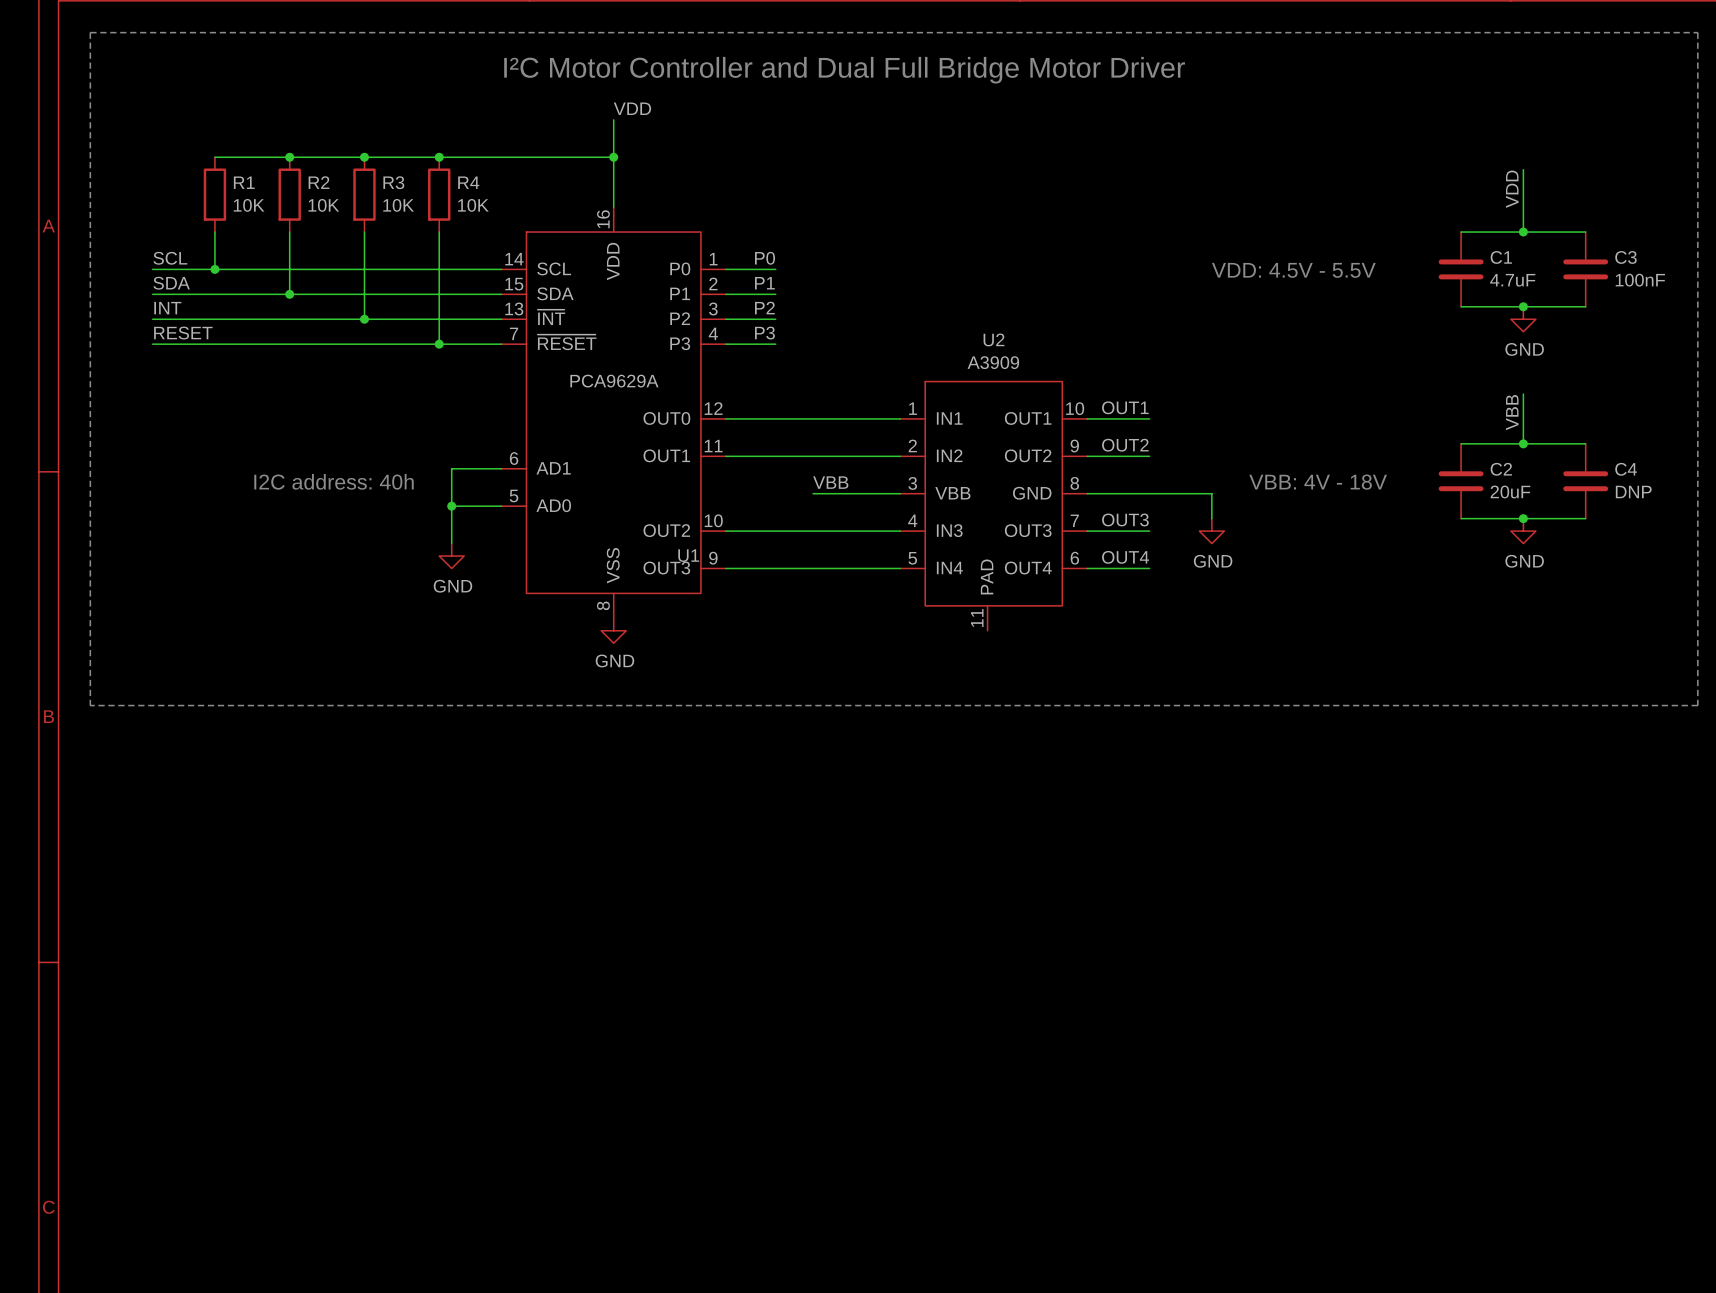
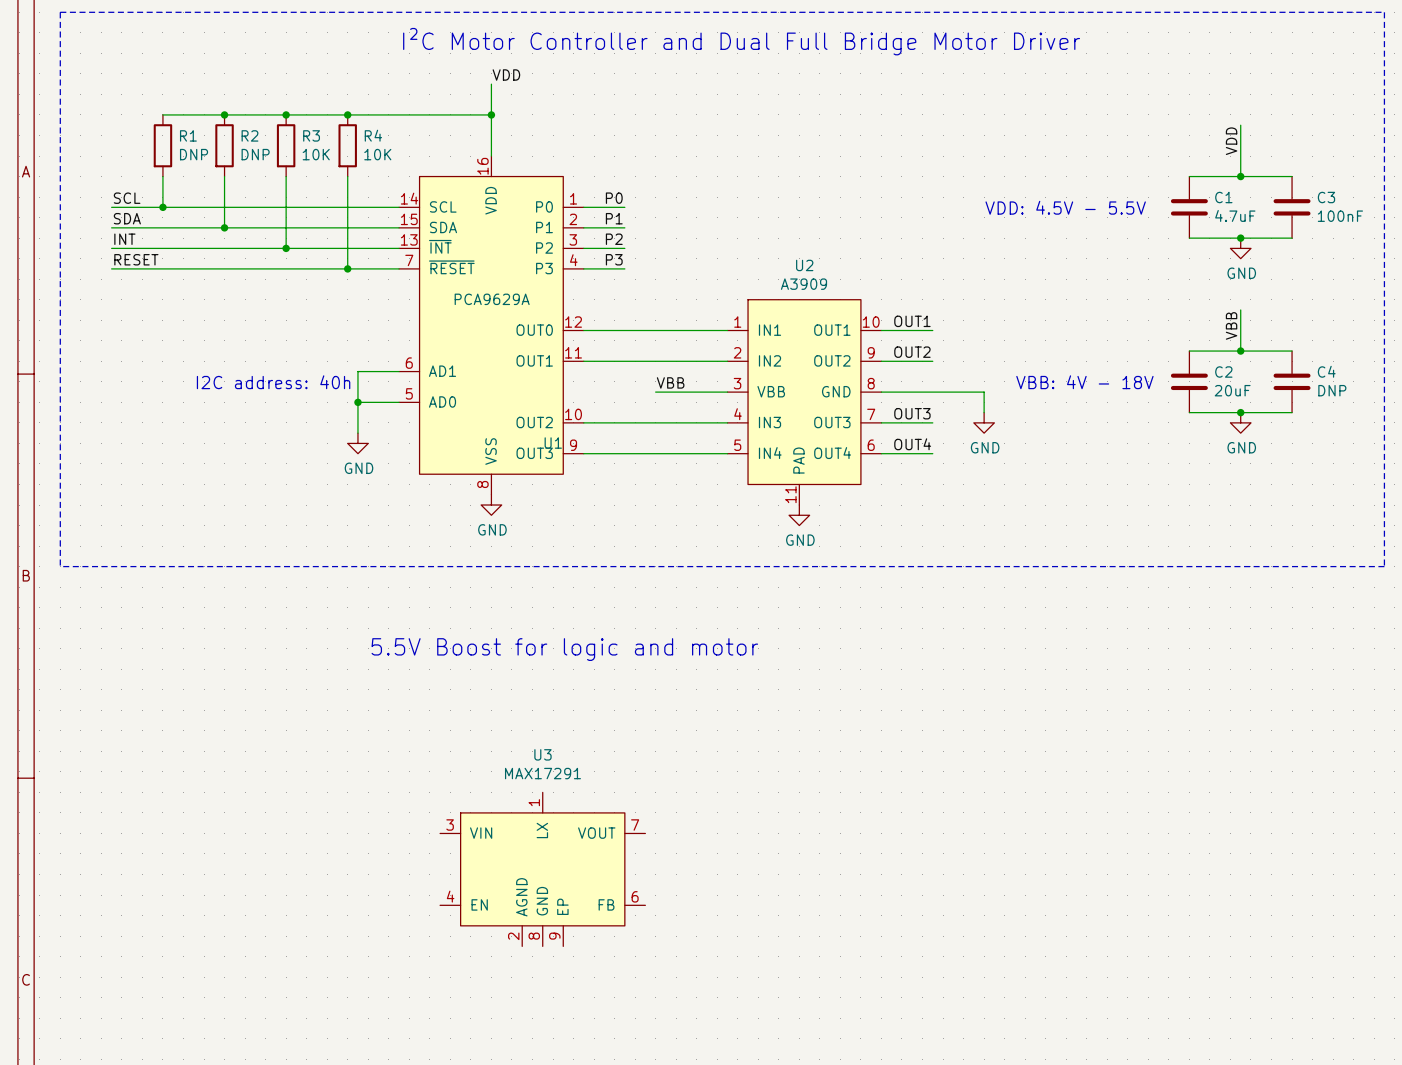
R1 value: 10K (249, 205) -> DNP (194, 154)
R2 value: 10K (323, 205) -> DNP (255, 154)
power symbol: none -> GND (799, 515)
text: none -> 5.5V Boost for logic and motor (564, 649)
U3: none -> MAX17291 (542, 869)

